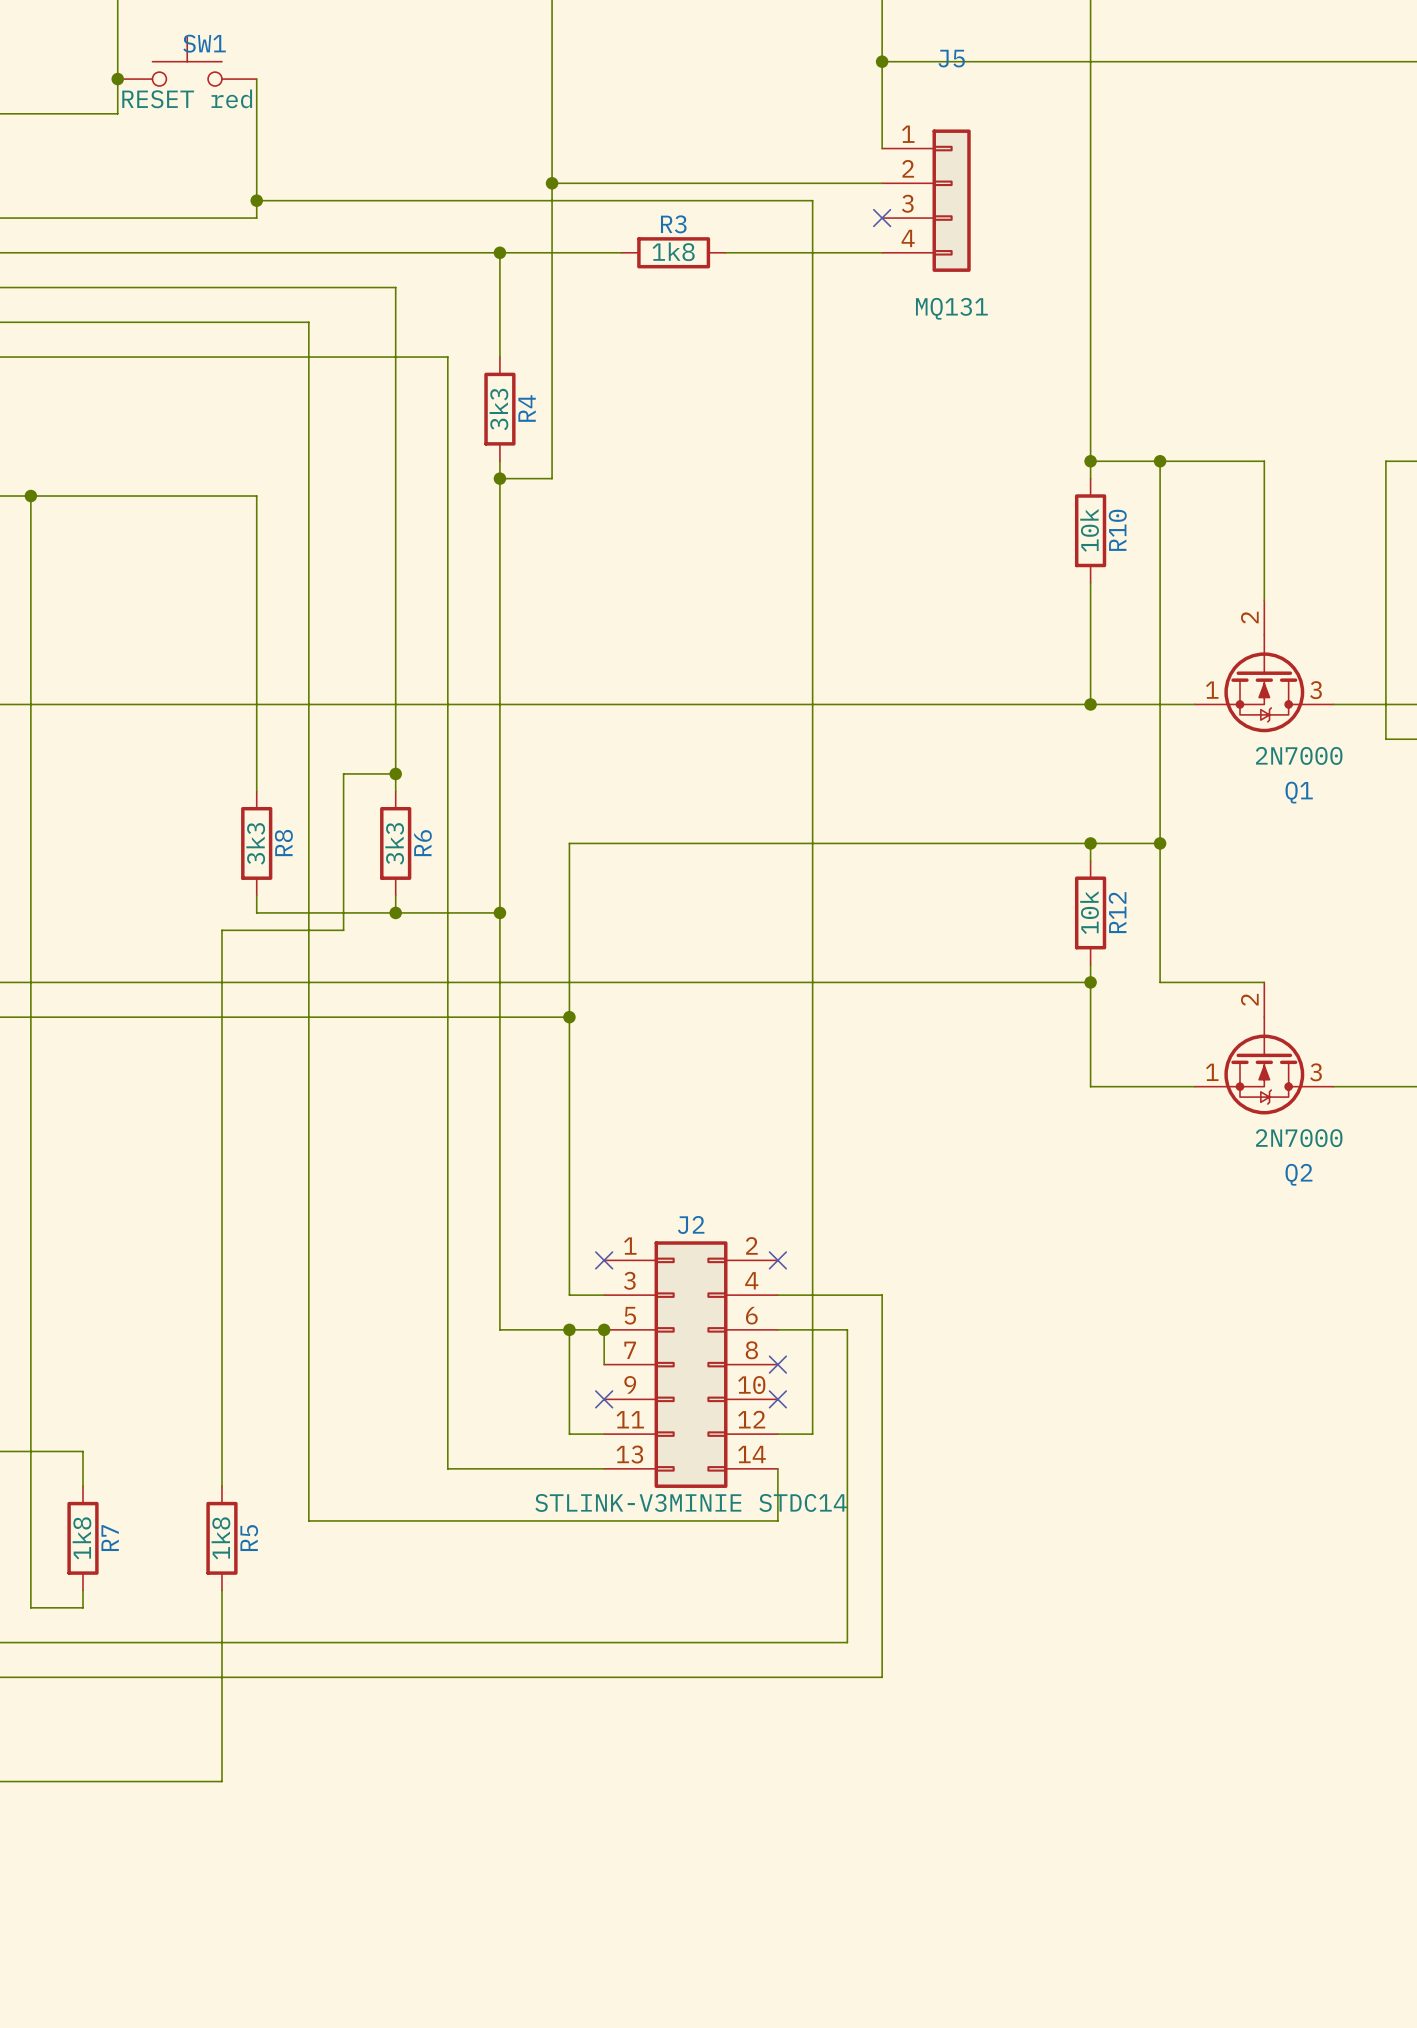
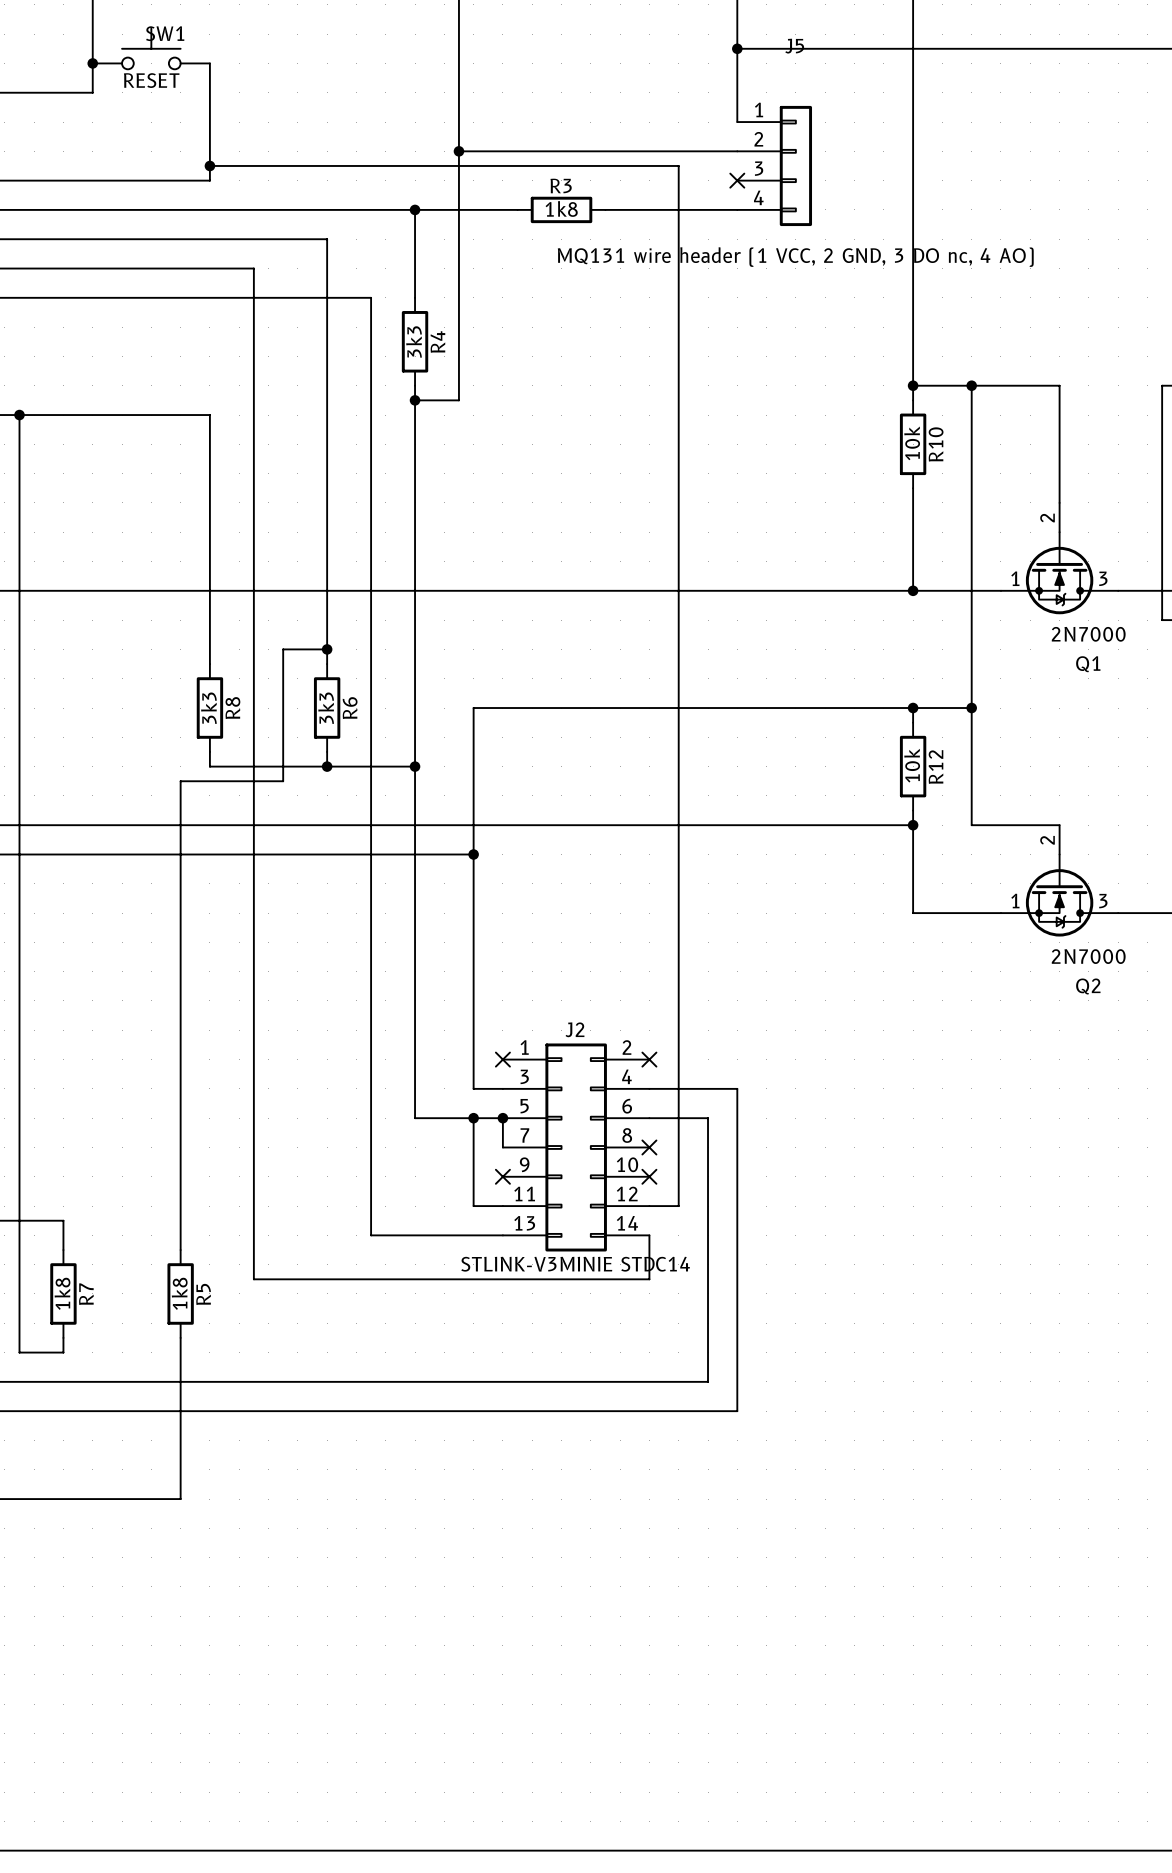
SW1 value: RESET red (187, 98) -> RESET (151, 80)
J5 value: MQ131 (951, 308) -> MQ131 wire header (1 VCC, 2 GND, 3 DO nc, 4 AO) (795, 257)

